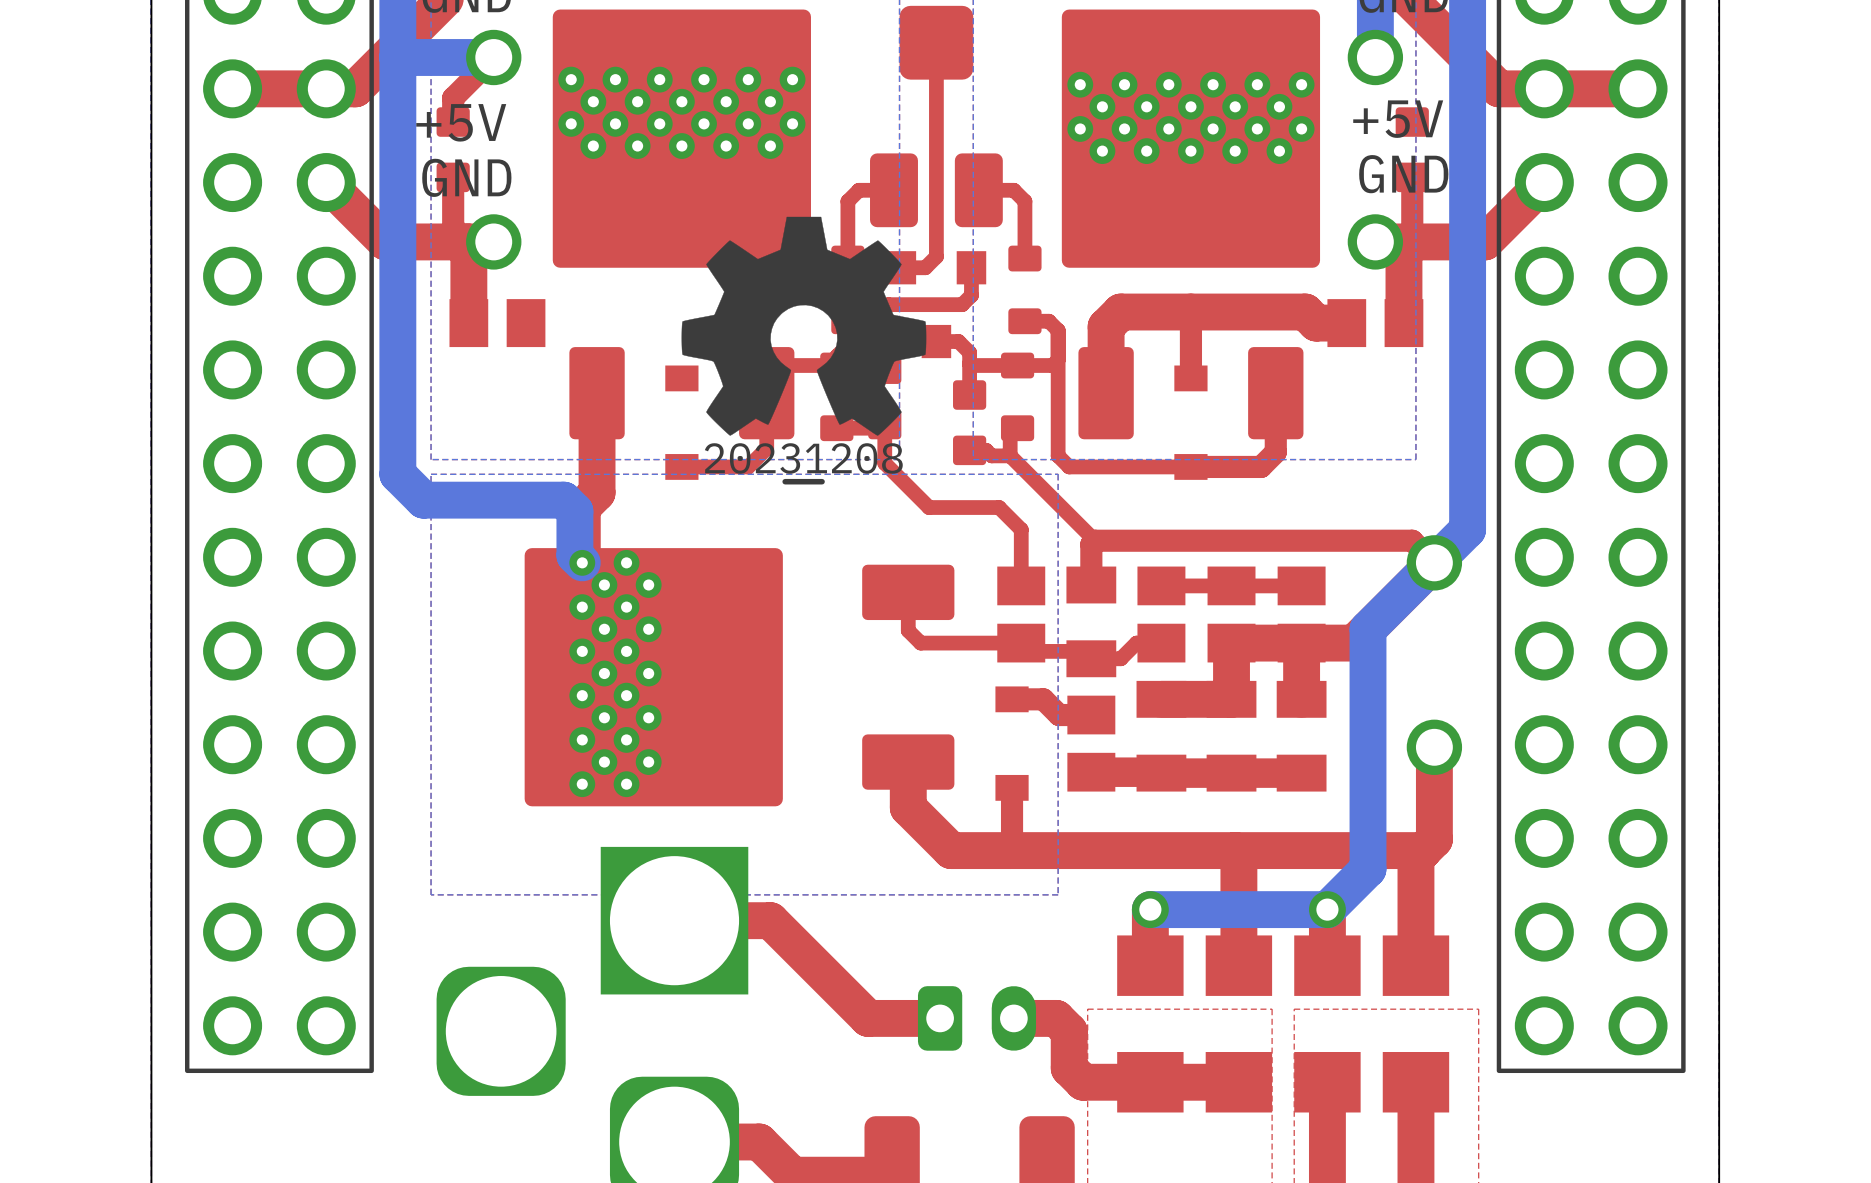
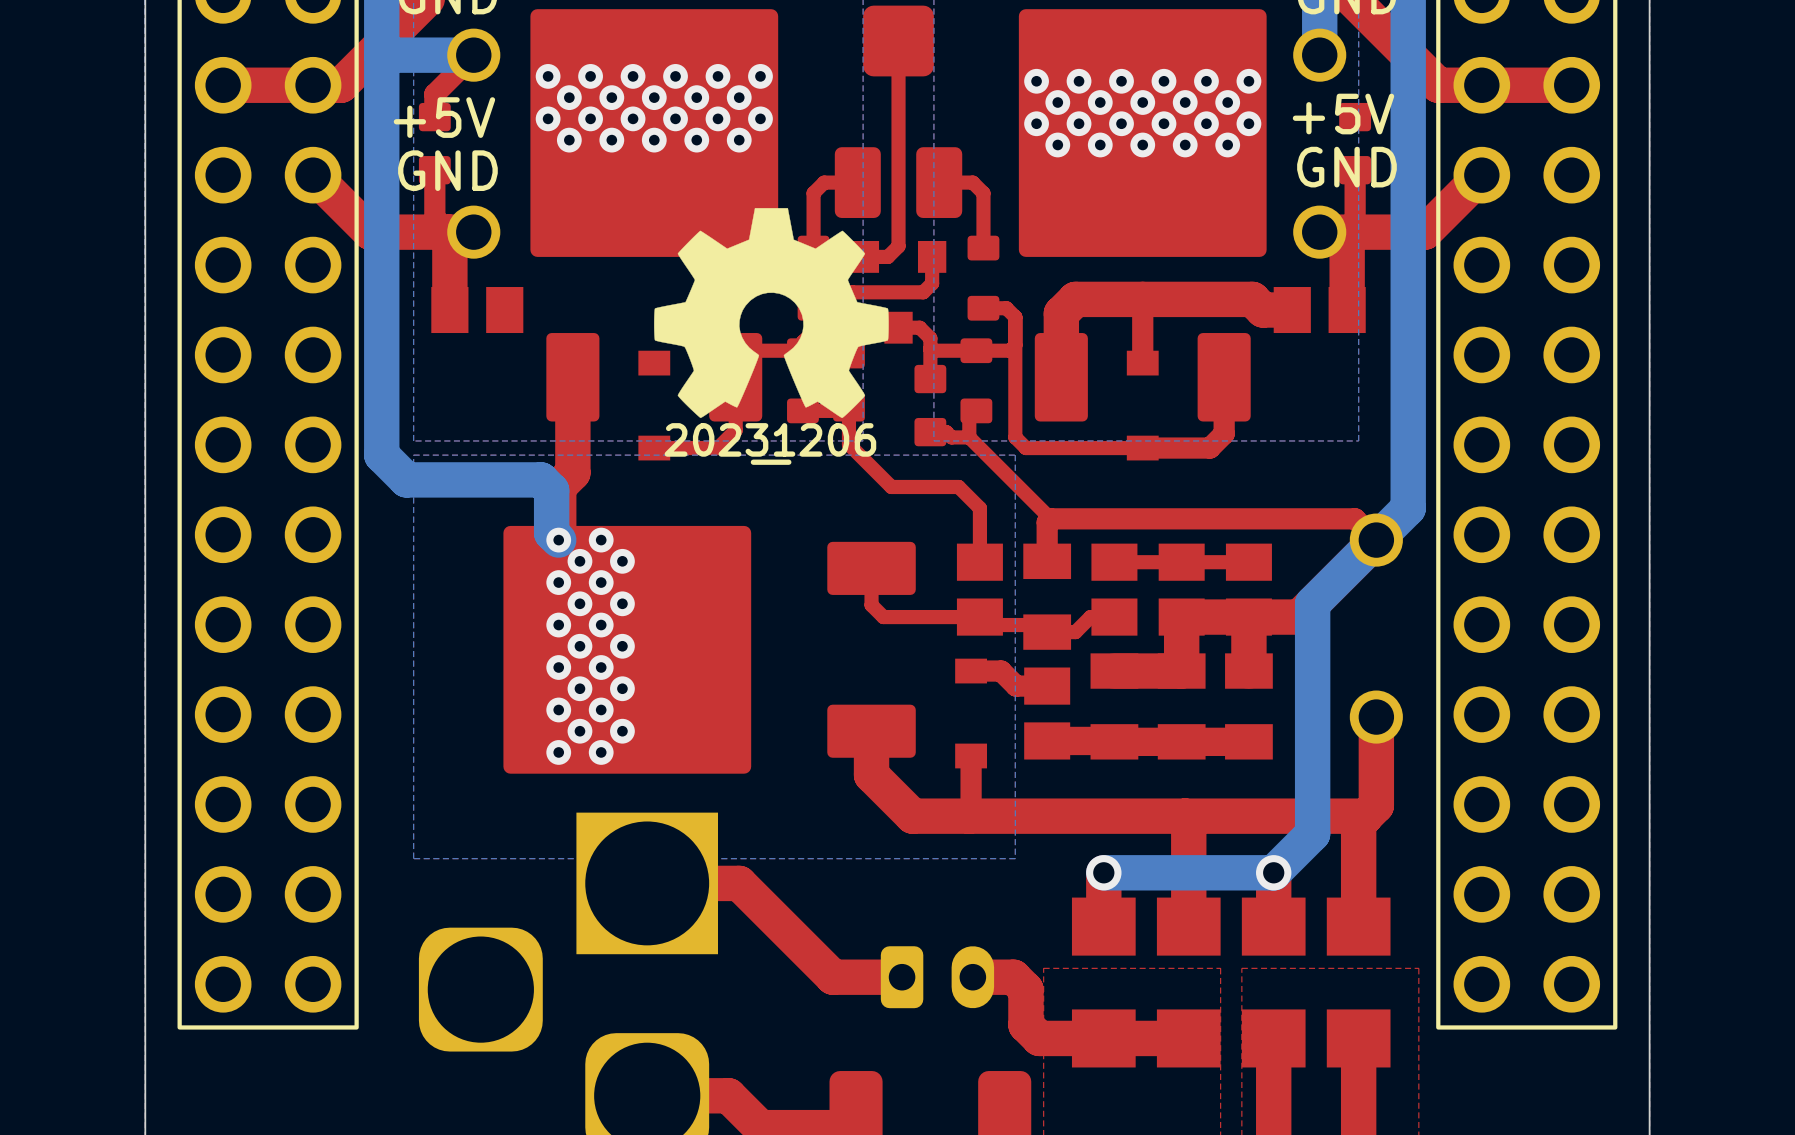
drawing shape: [704, 443, 903, 485] -> [664, 423, 877, 465]

